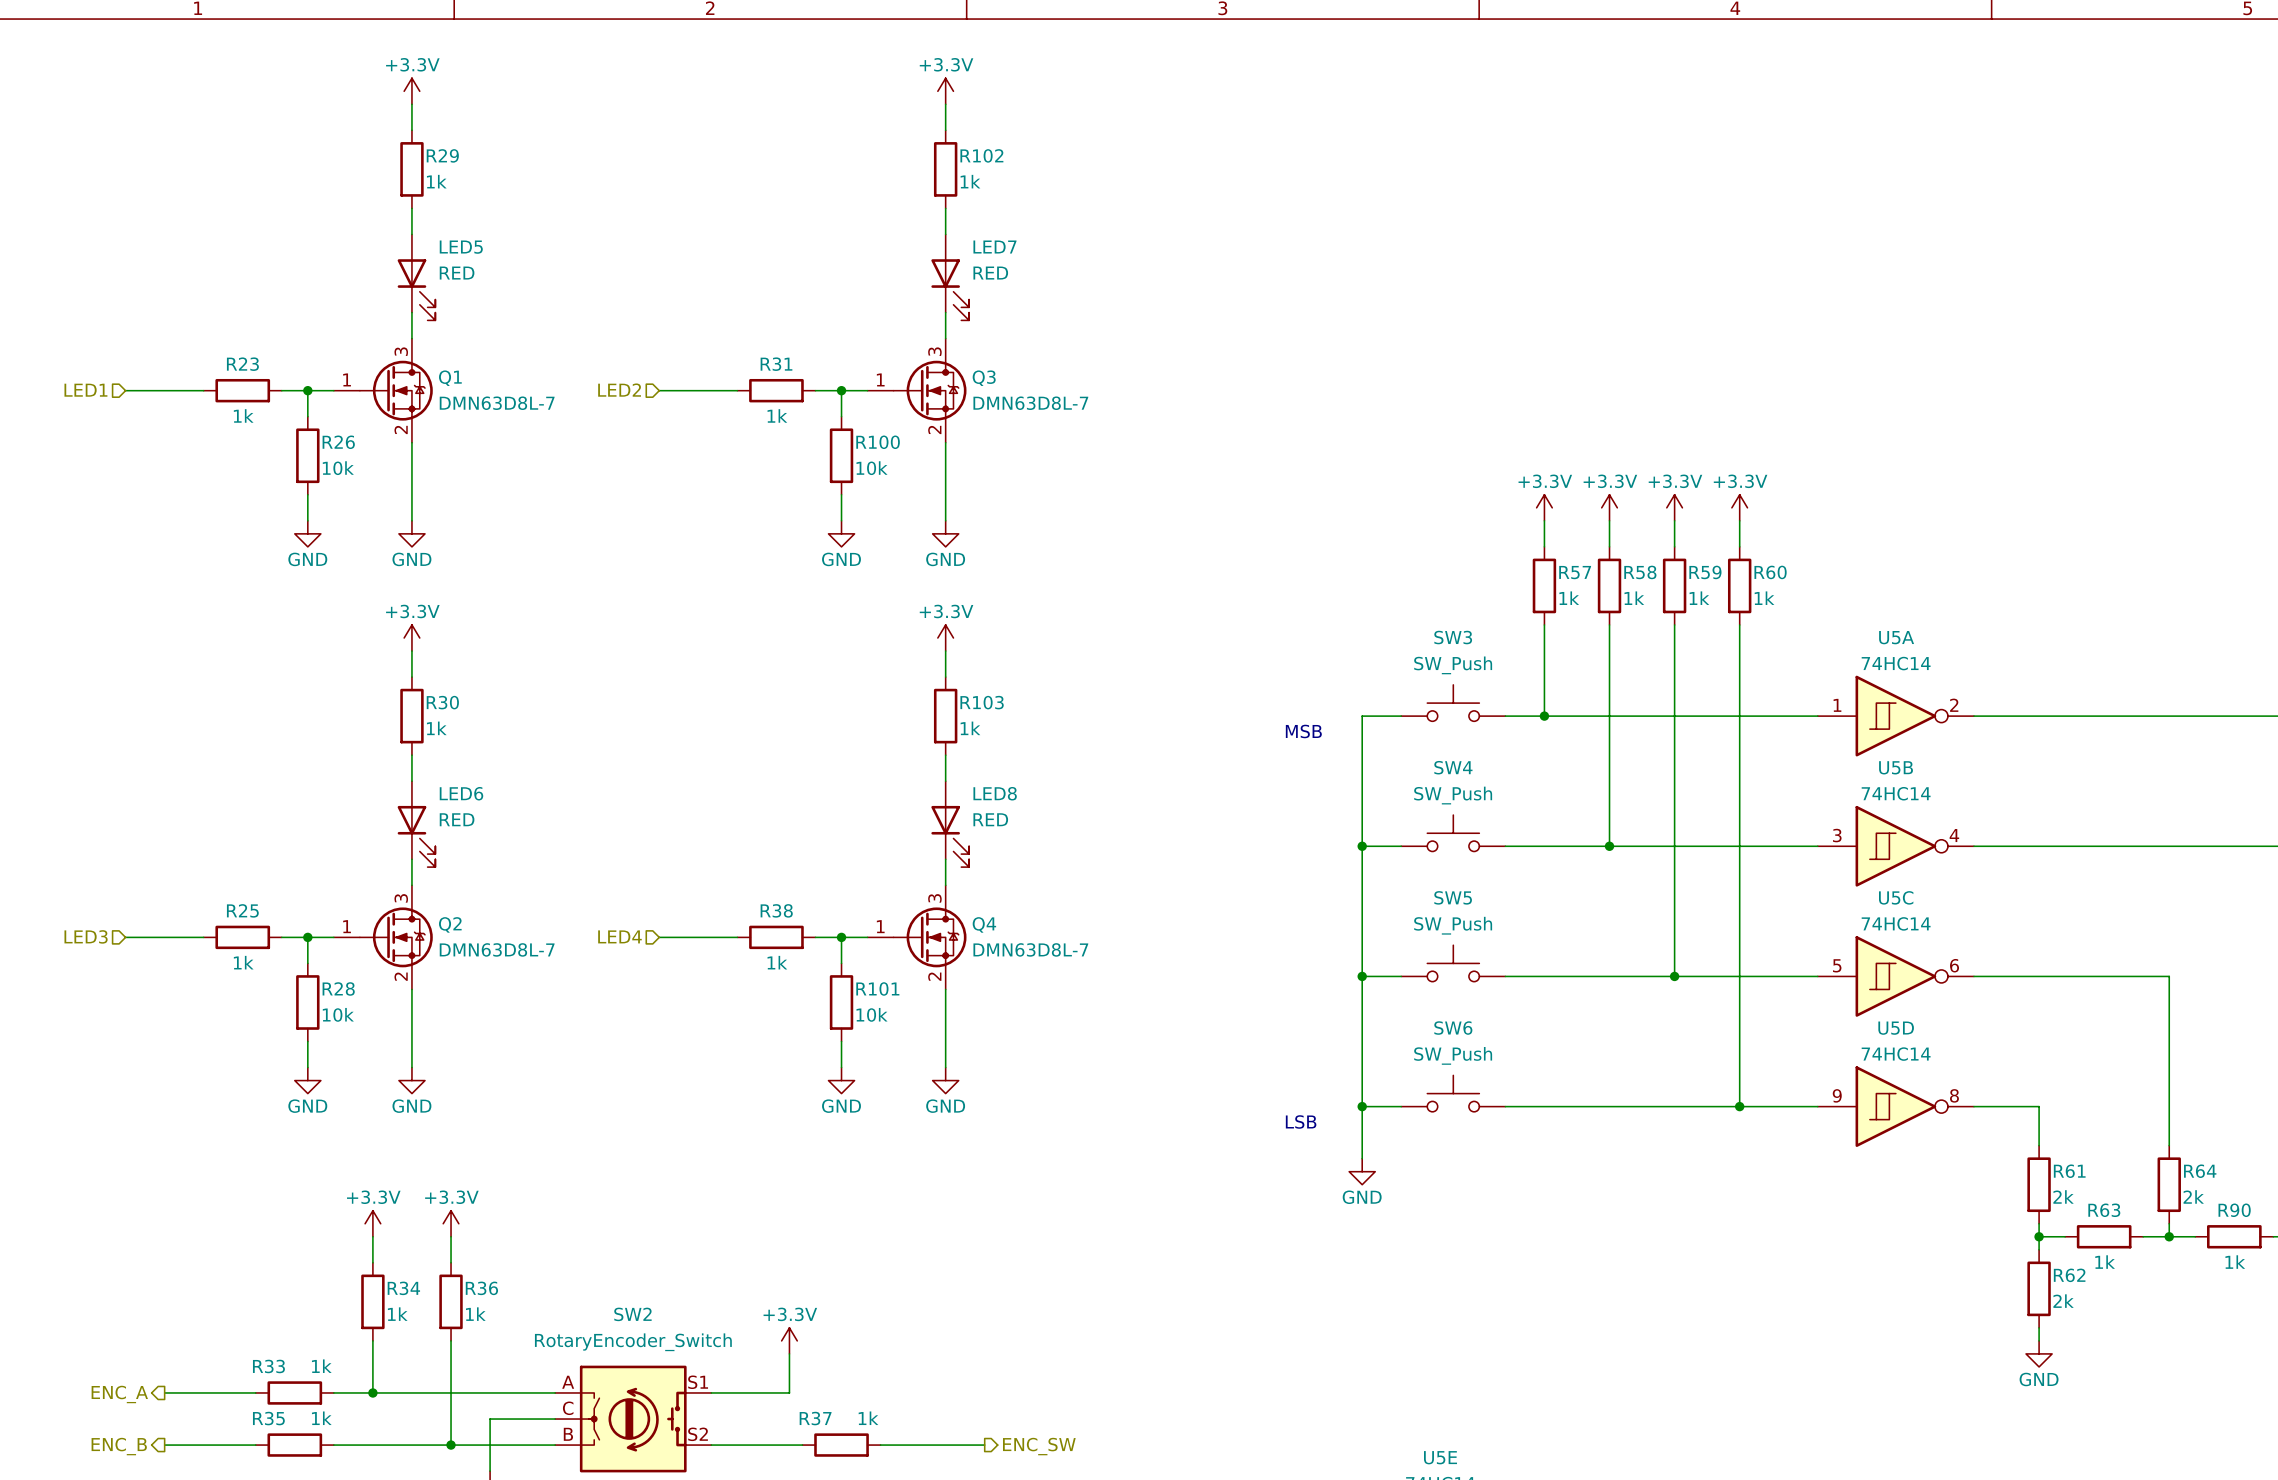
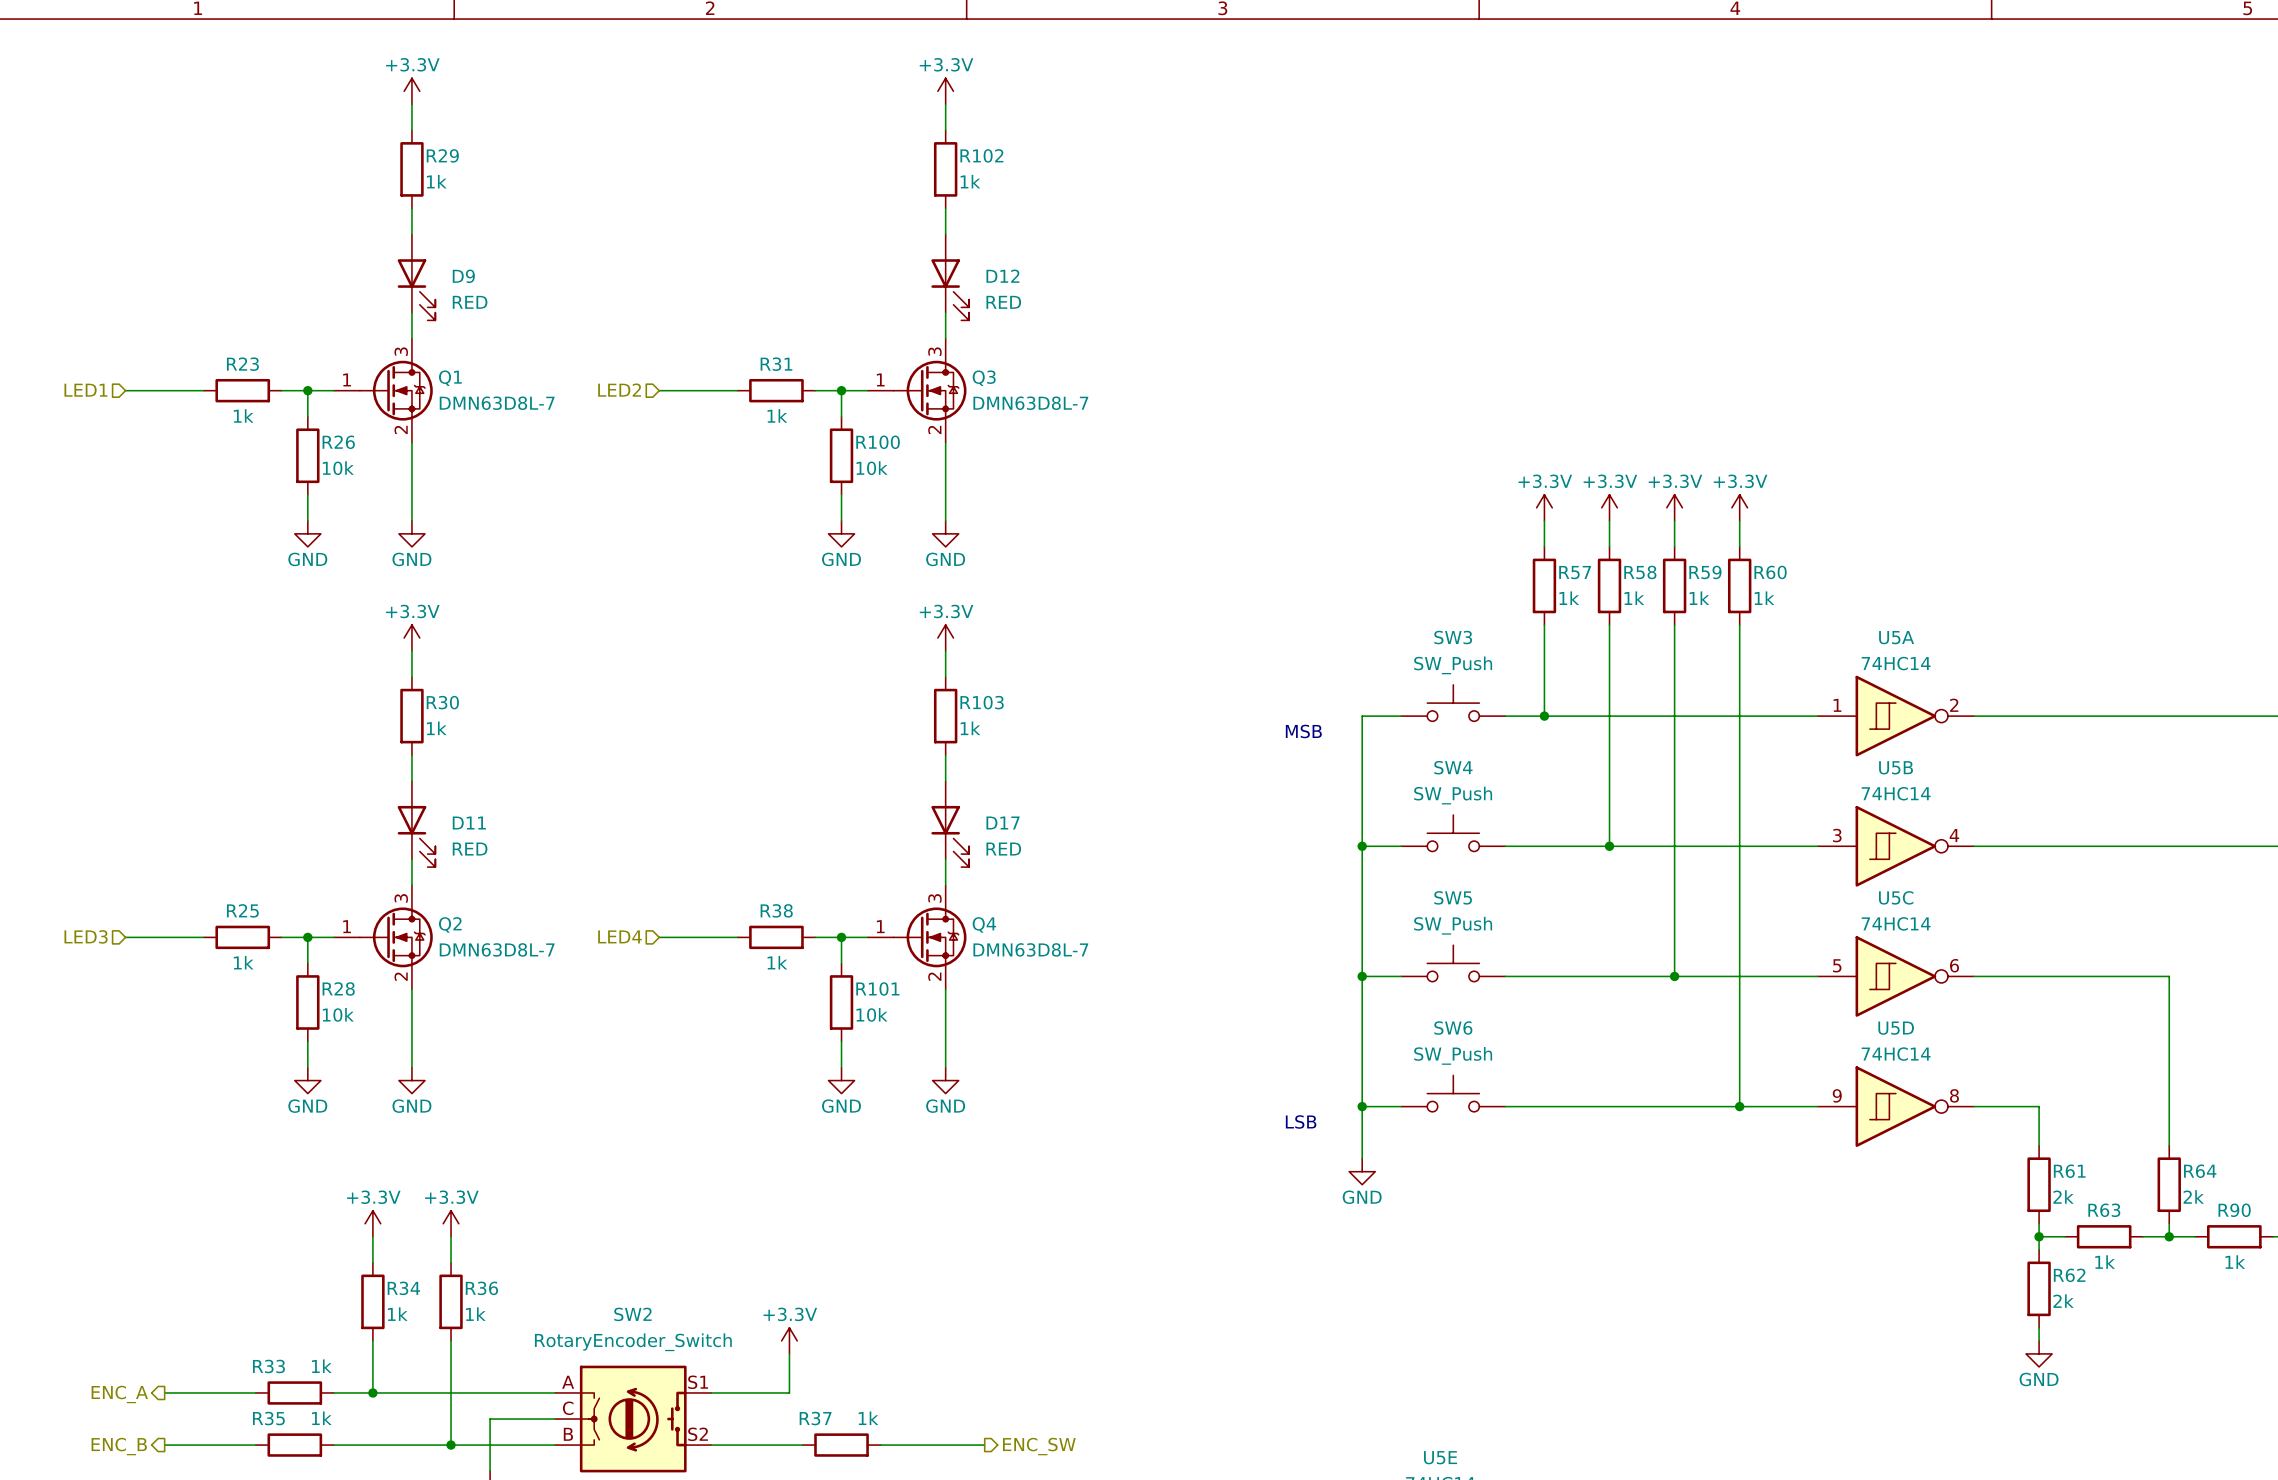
LED5 name: LED5 (461, 247) -> D9 (463, 276)
LED7 name: LED7 (994, 247) -> D12 (1002, 276)
LED5 value position: RED (457, 273) -> RED (470, 302)
LED7 value position: RED (990, 273) -> RED (1003, 302)
LED6 name: LED6 (461, 793) -> D11 (469, 823)
LED8 name: LED8 (995, 793) -> D17 (1003, 823)
LED6 value position: RED (457, 819) -> RED (470, 849)
LED8 value position: RED (990, 819) -> RED (1003, 849)

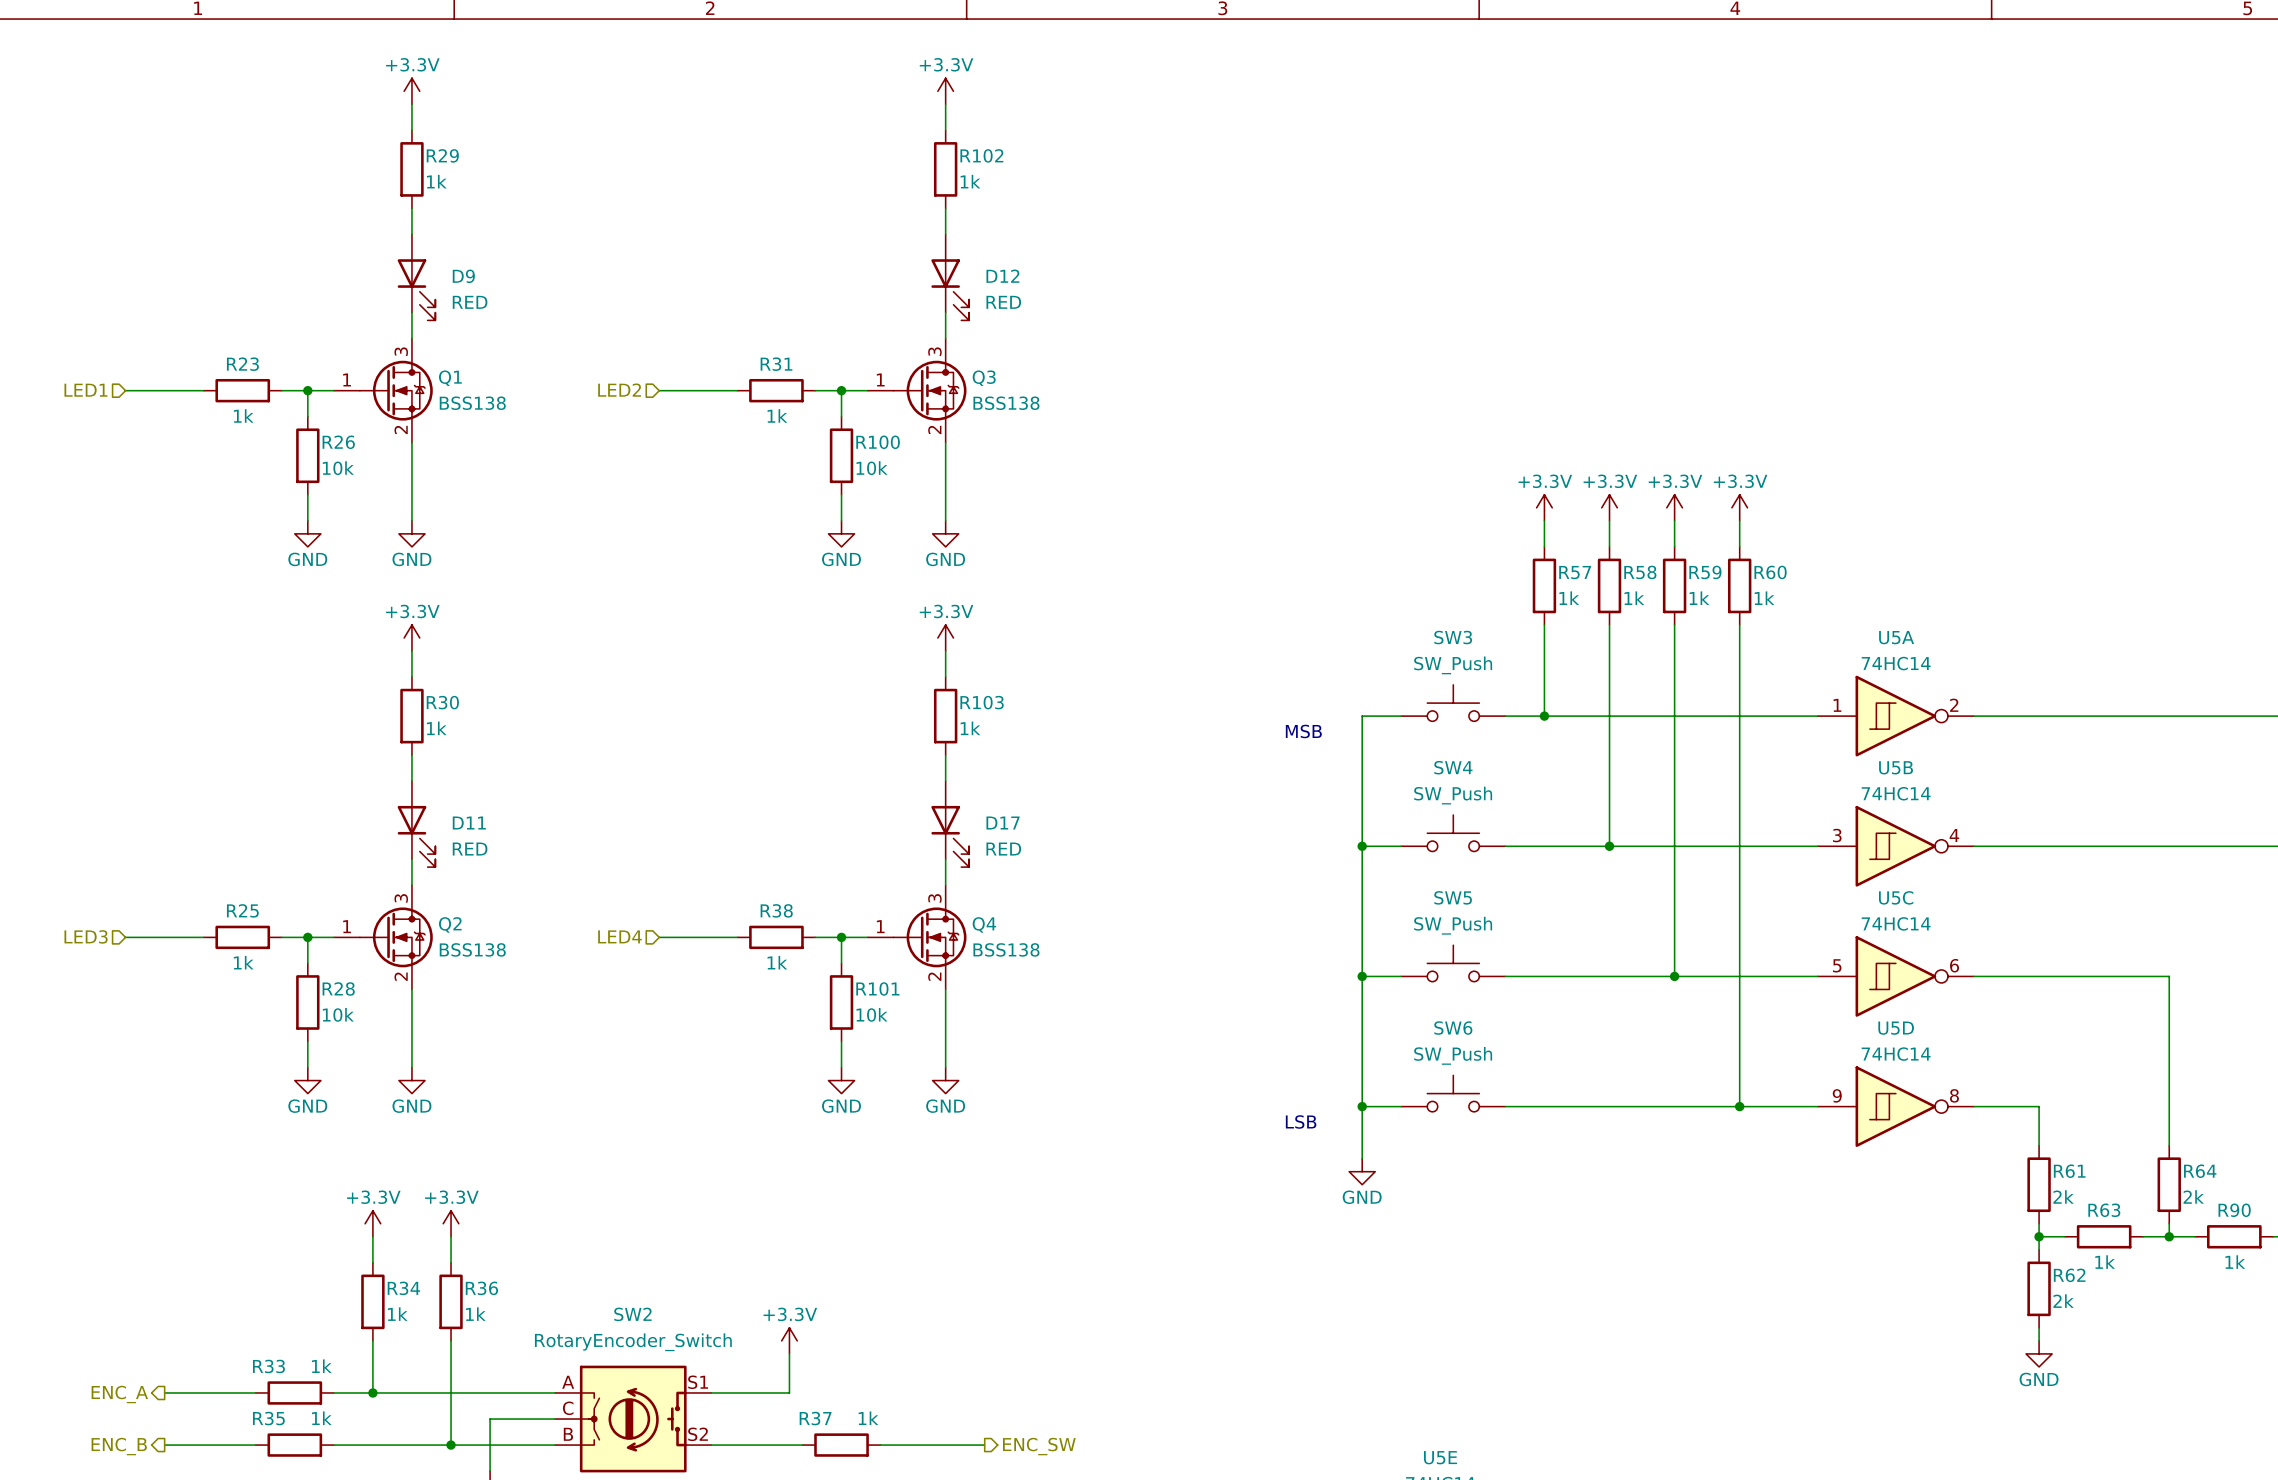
Q1 value: DMN63D8L-7 (497, 403) -> BSS138 (472, 403)
Q3 value: DMN63D8L-7 (1030, 403) -> BSS138 (1006, 403)
Q2 value: DMN63D8L-7 (497, 949) -> BSS138 (472, 949)
Q4 value: DMN63D8L-7 (1030, 949) -> BSS138 (1006, 949)

